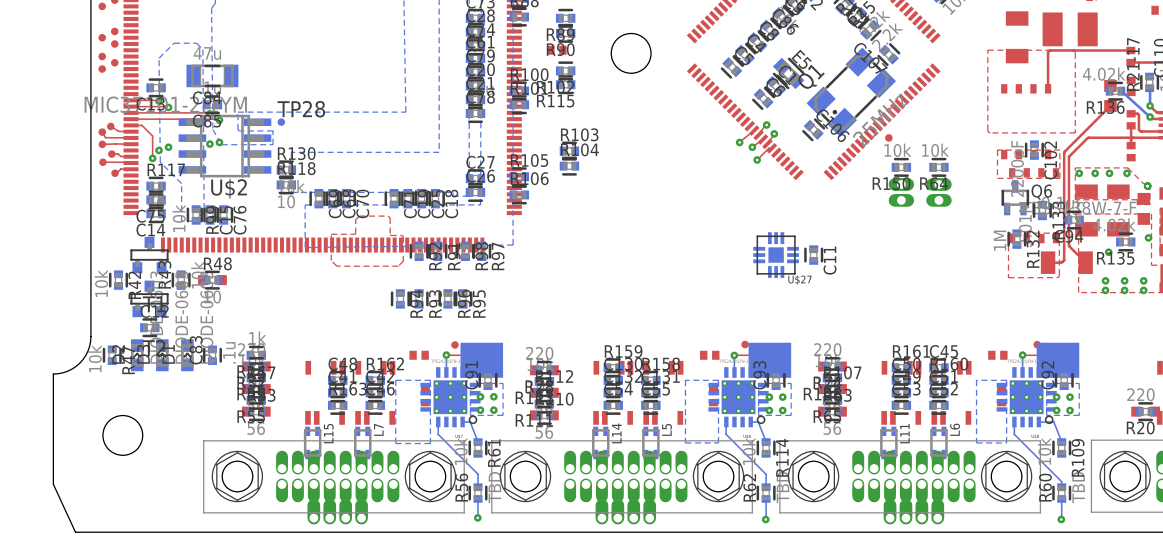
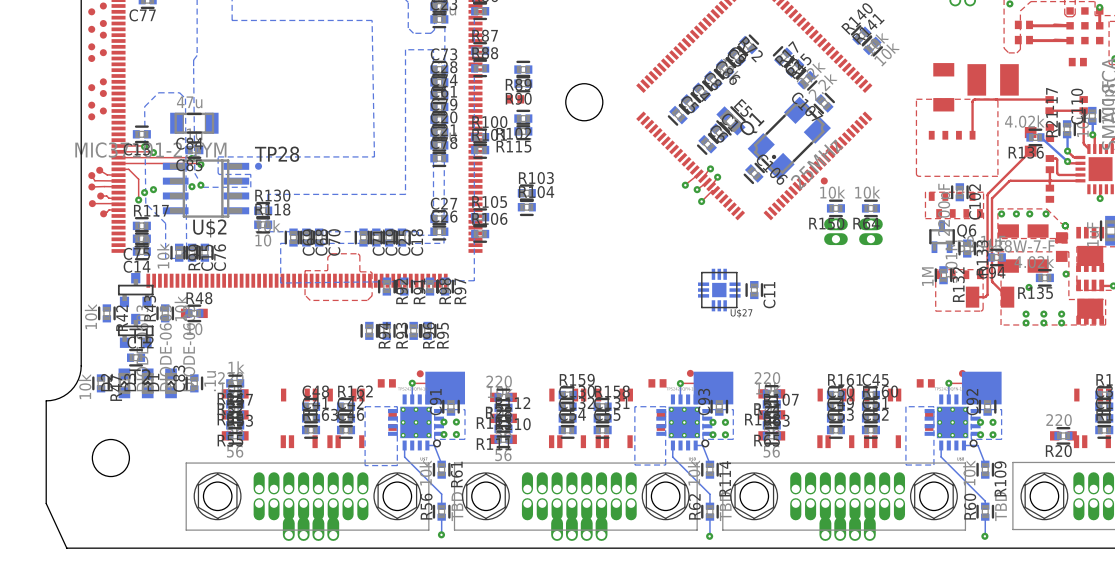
L15: (312, 442) -> none
L7: (362, 442) -> none
L14: (600, 442) -> none
L5: (650, 442) -> none
L11: (888, 442) -> none
L6: (938, 442) -> none

